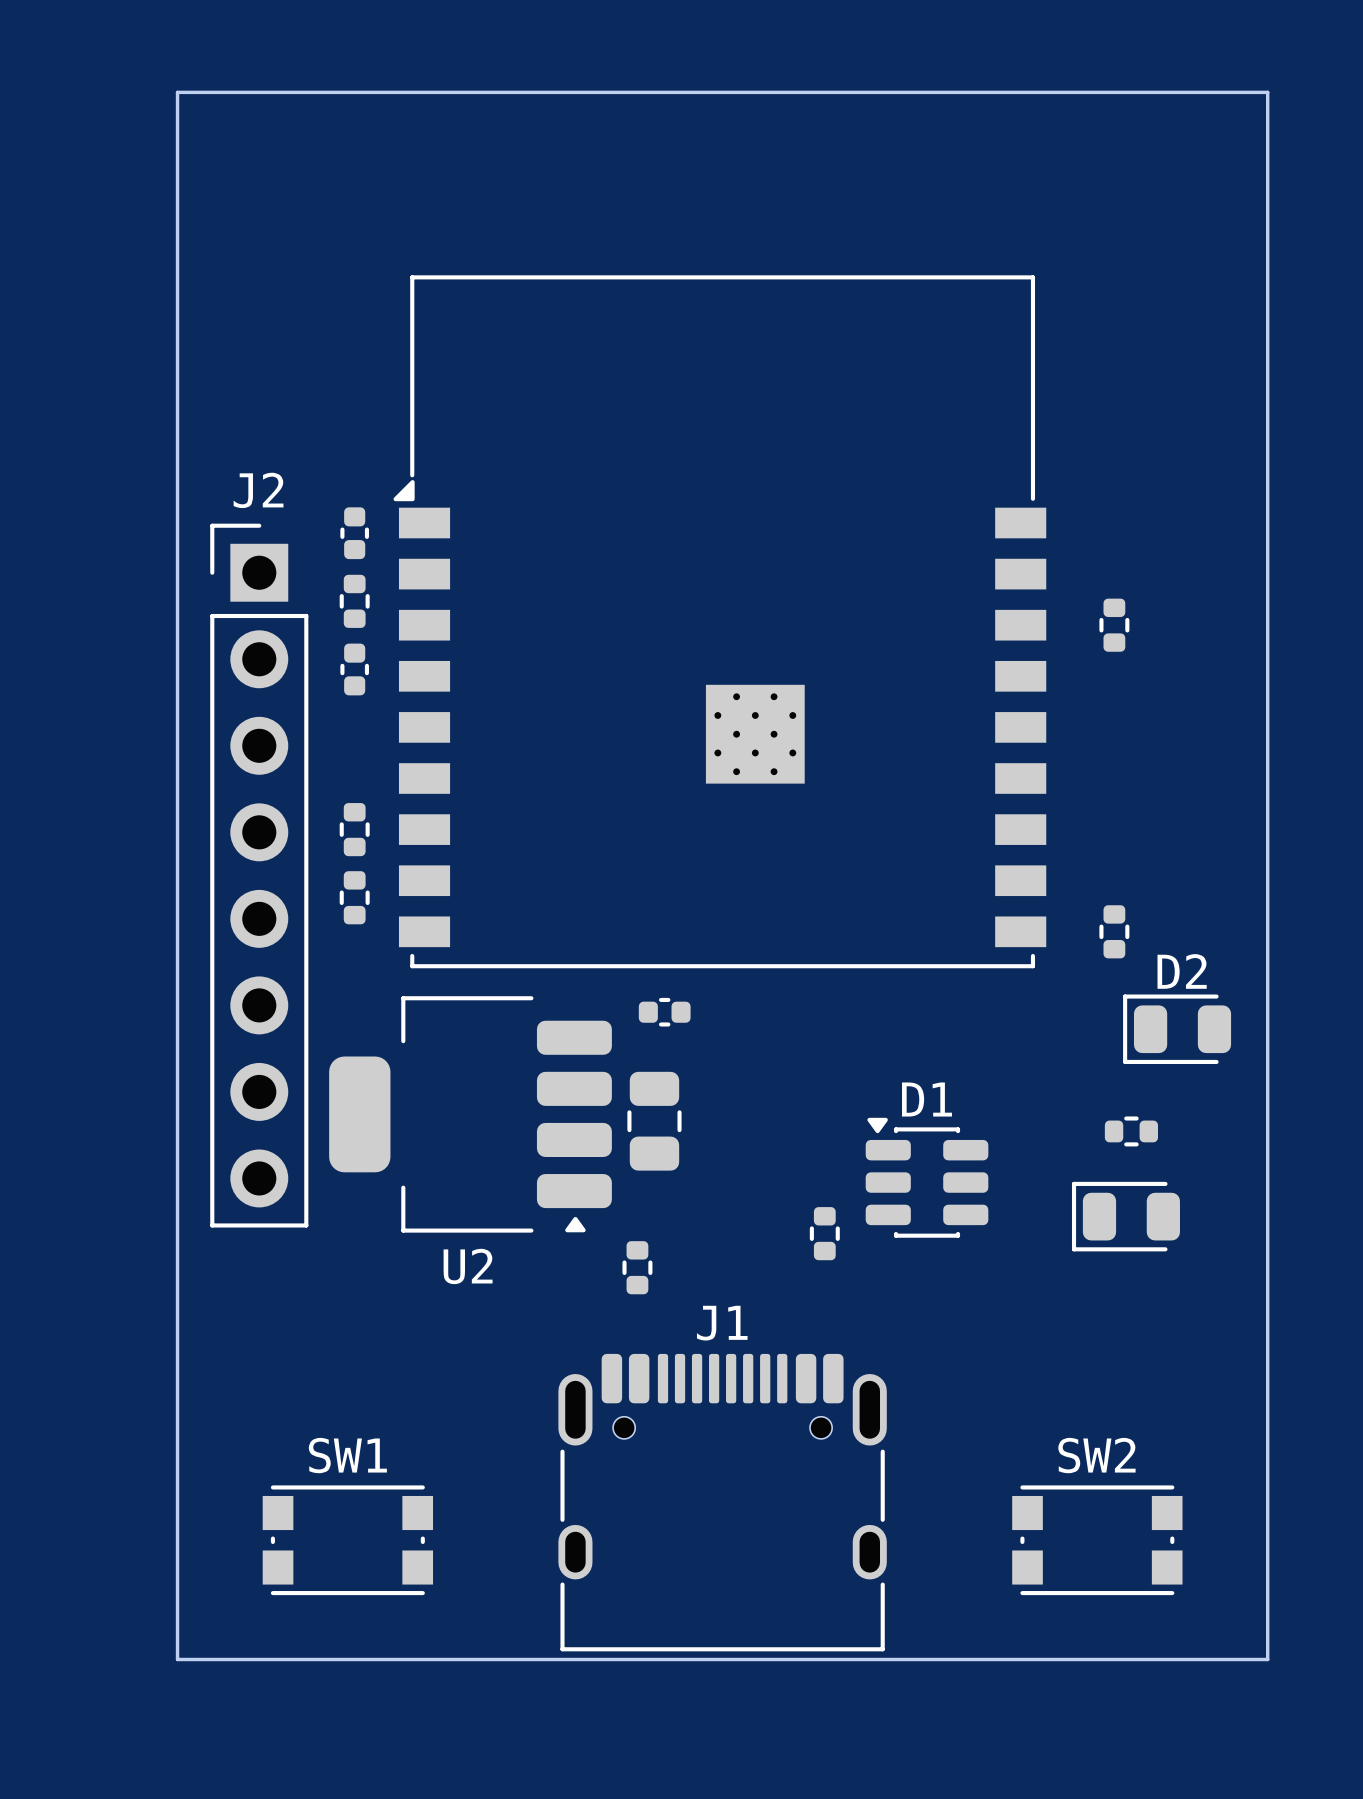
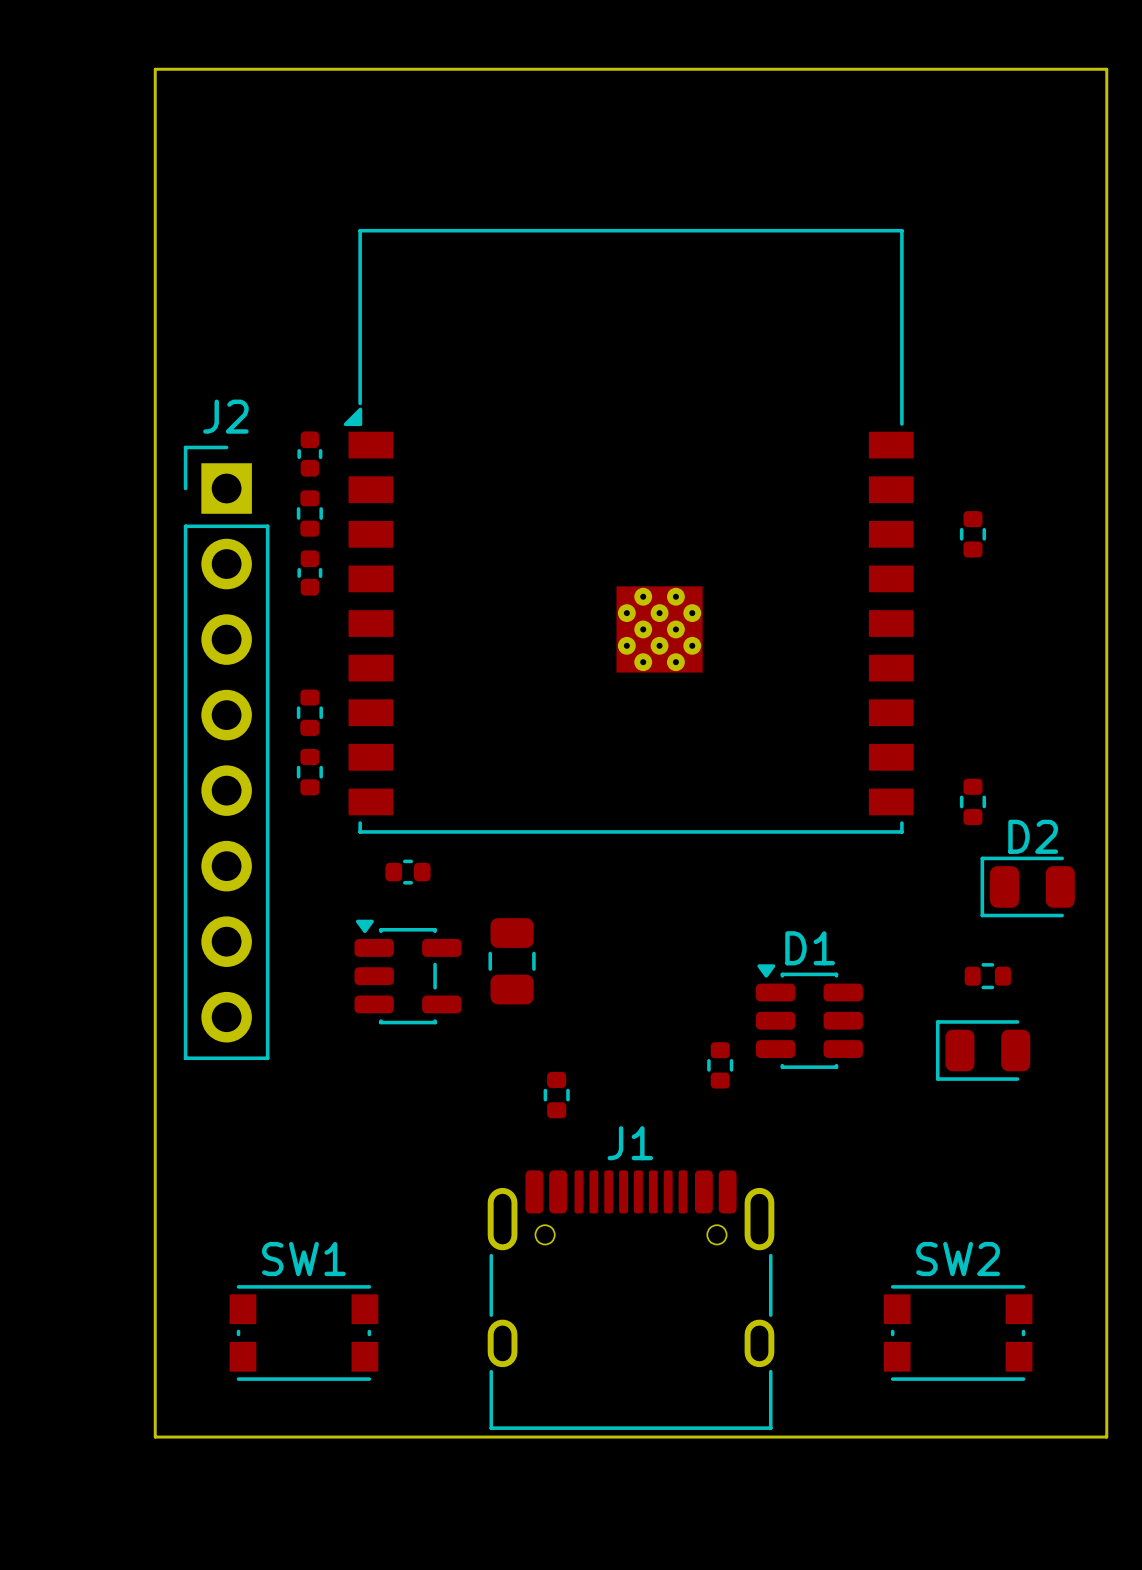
part position: (664, 1012) -> (408, 872)
U2: (470, 1114) -> none
part position: (654, 1121) -> (512, 961)
part: none -> (408, 972)

